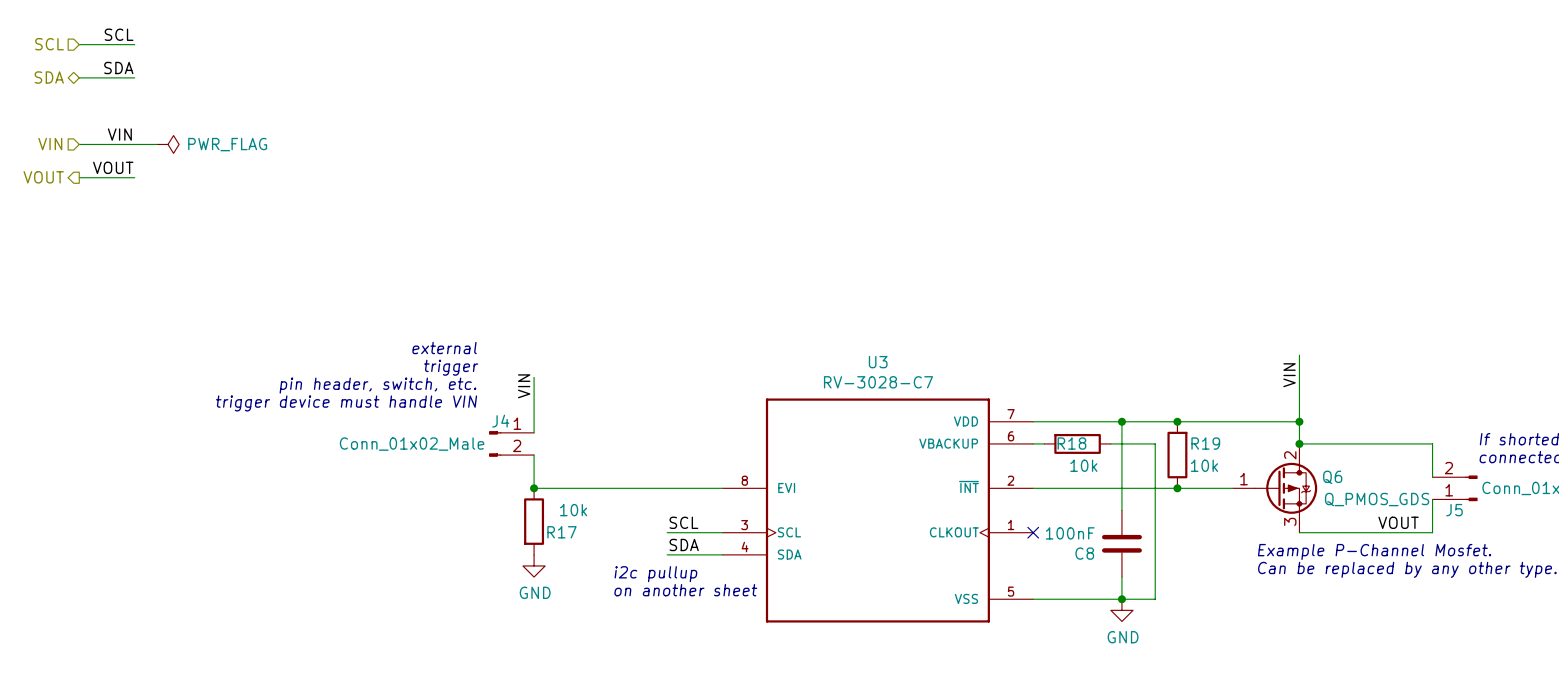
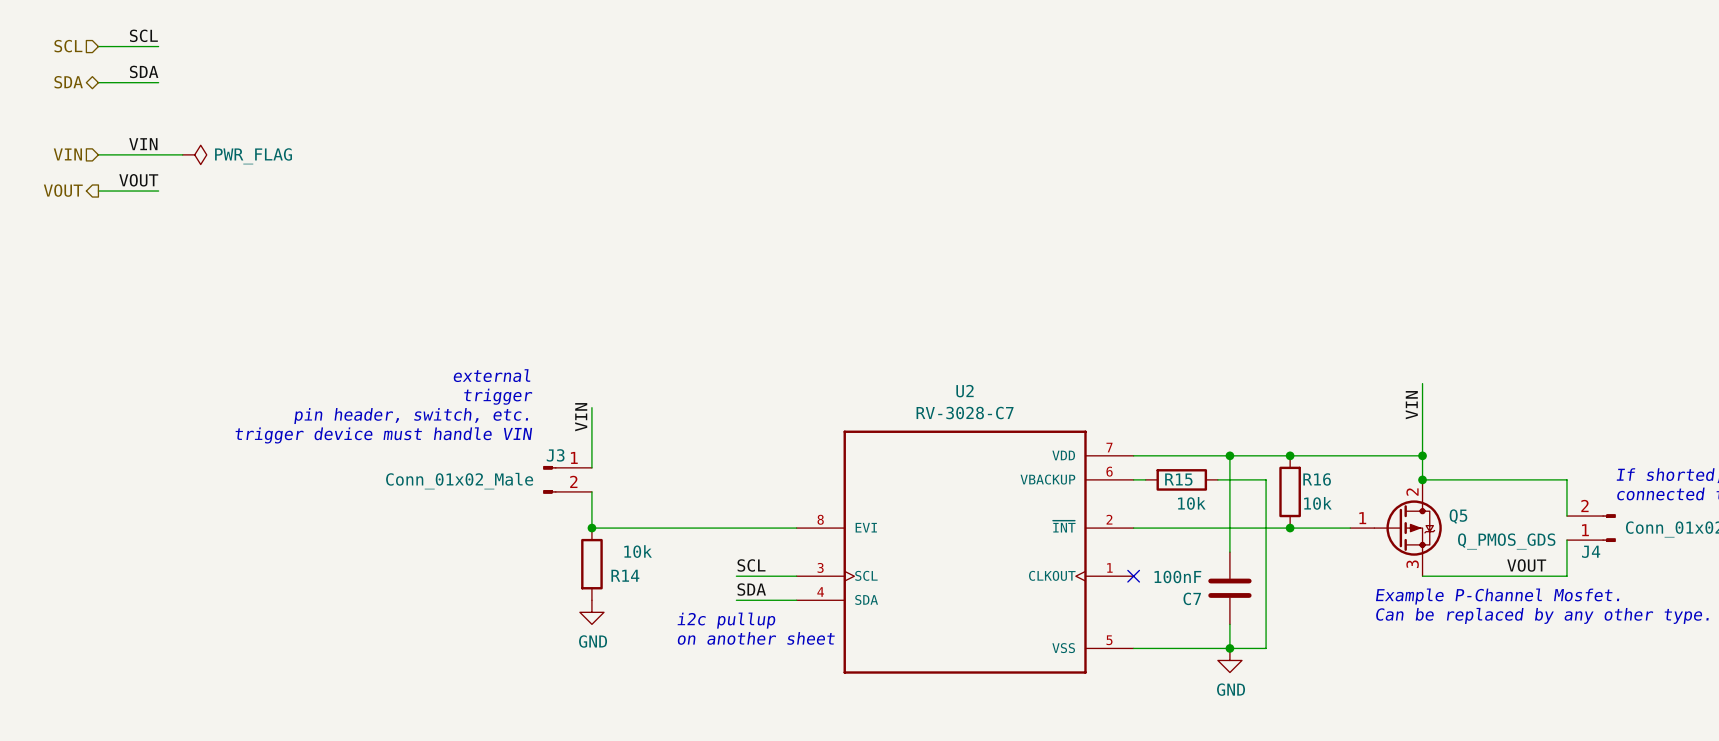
U3 name: U3 (878, 362) -> U2 (965, 391)
J4 name: J4 (500, 421) -> J3 (555, 455)
R18 name: R18 (1071, 443) -> R15 (1178, 479)
R19 name: R19 (1205, 443) -> R16 (1317, 479)
Q6 name: Q6 (1332, 477) -> Q5 (1458, 516)
J5 name: J5 (1454, 510) -> J4 (1591, 551)
R17 name: R17 (561, 532) -> R14 (625, 575)
C8 name: C8 (1084, 553) -> C7 (1192, 598)

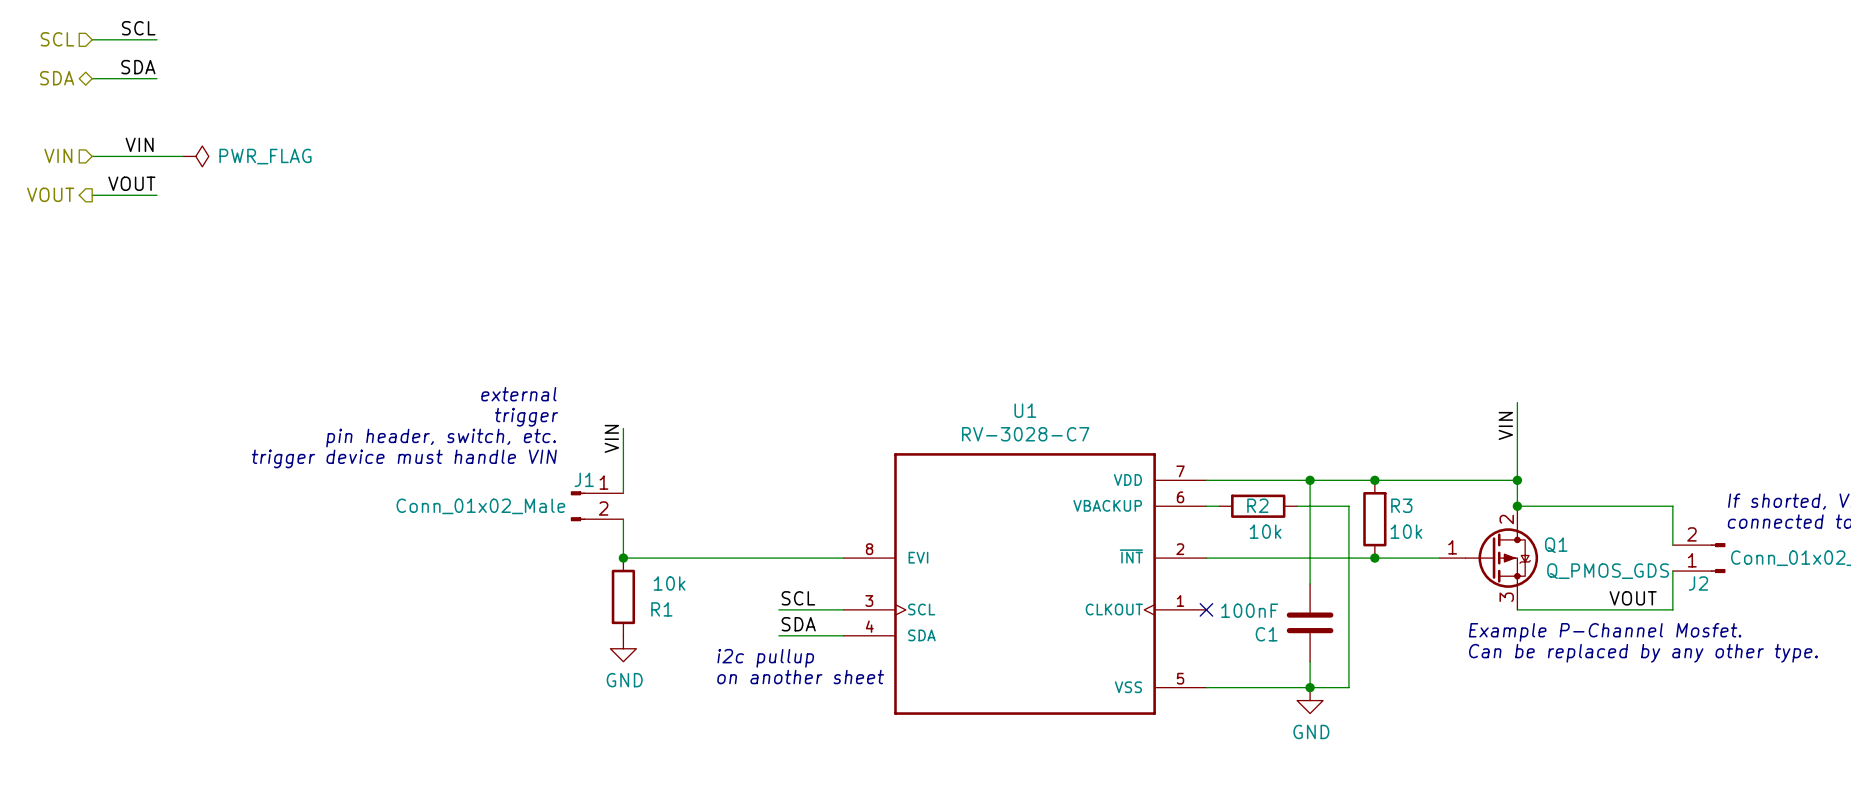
U2 name: U2 (965, 391) -> U1 (1025, 410)
J3 name: J3 (555, 455) -> J1 (584, 479)
R15 name: R15 (1178, 479) -> R2 (1257, 505)
R16 name: R16 (1317, 479) -> R3 (1401, 505)
Q5 name: Q5 (1458, 516) -> Q1 (1556, 545)
J4 name: J4 (1591, 551) -> J2 (1698, 583)
R14 name: R14 (625, 575) -> R1 (661, 609)
C7 name: C7 (1192, 598) -> C1 (1266, 634)

